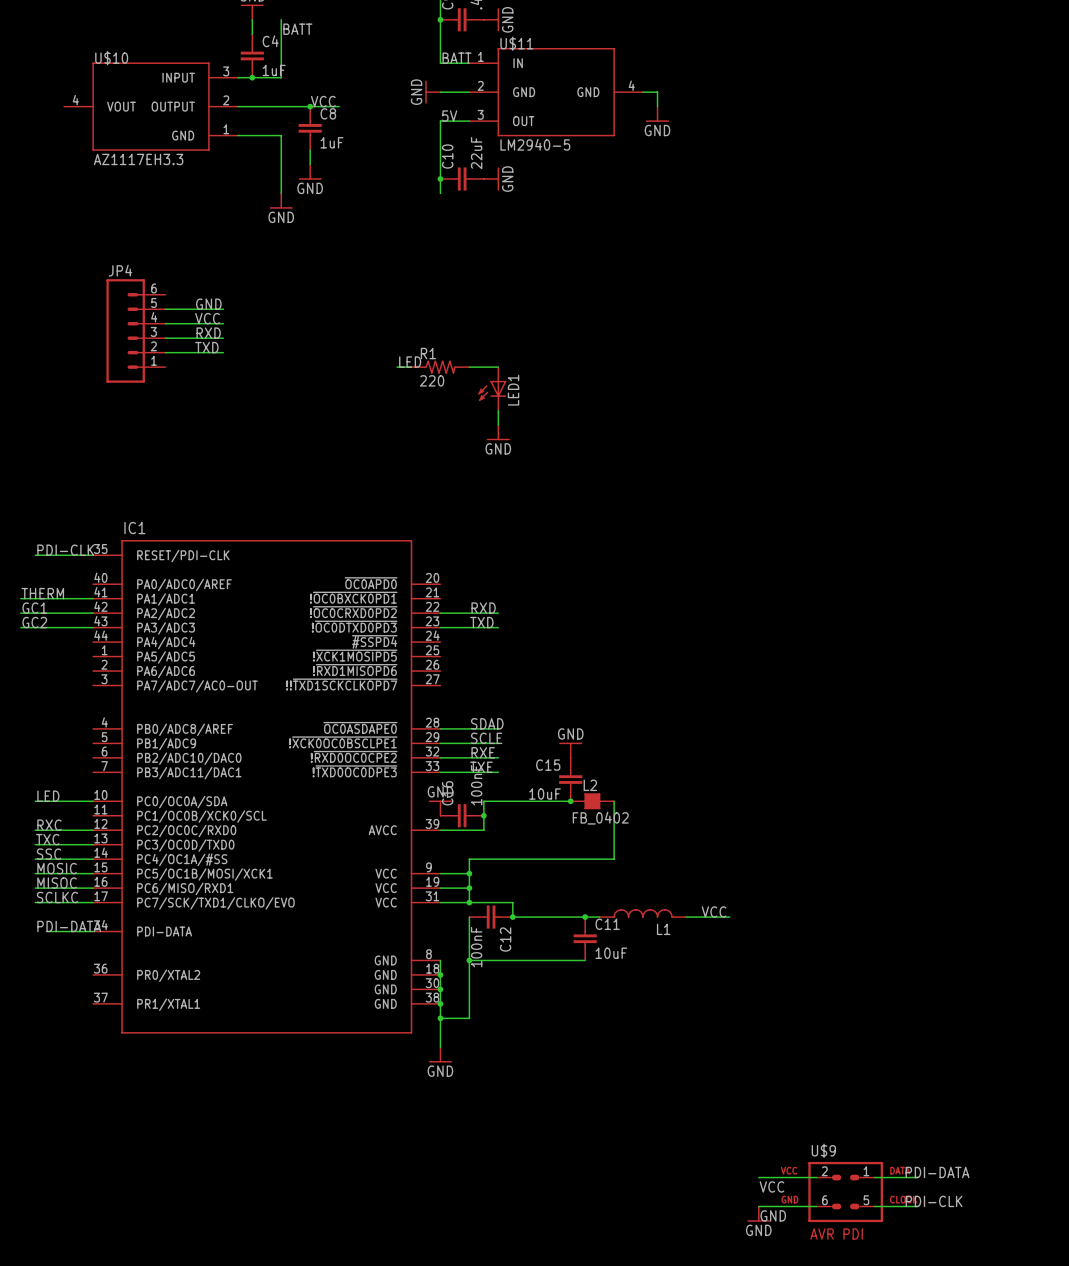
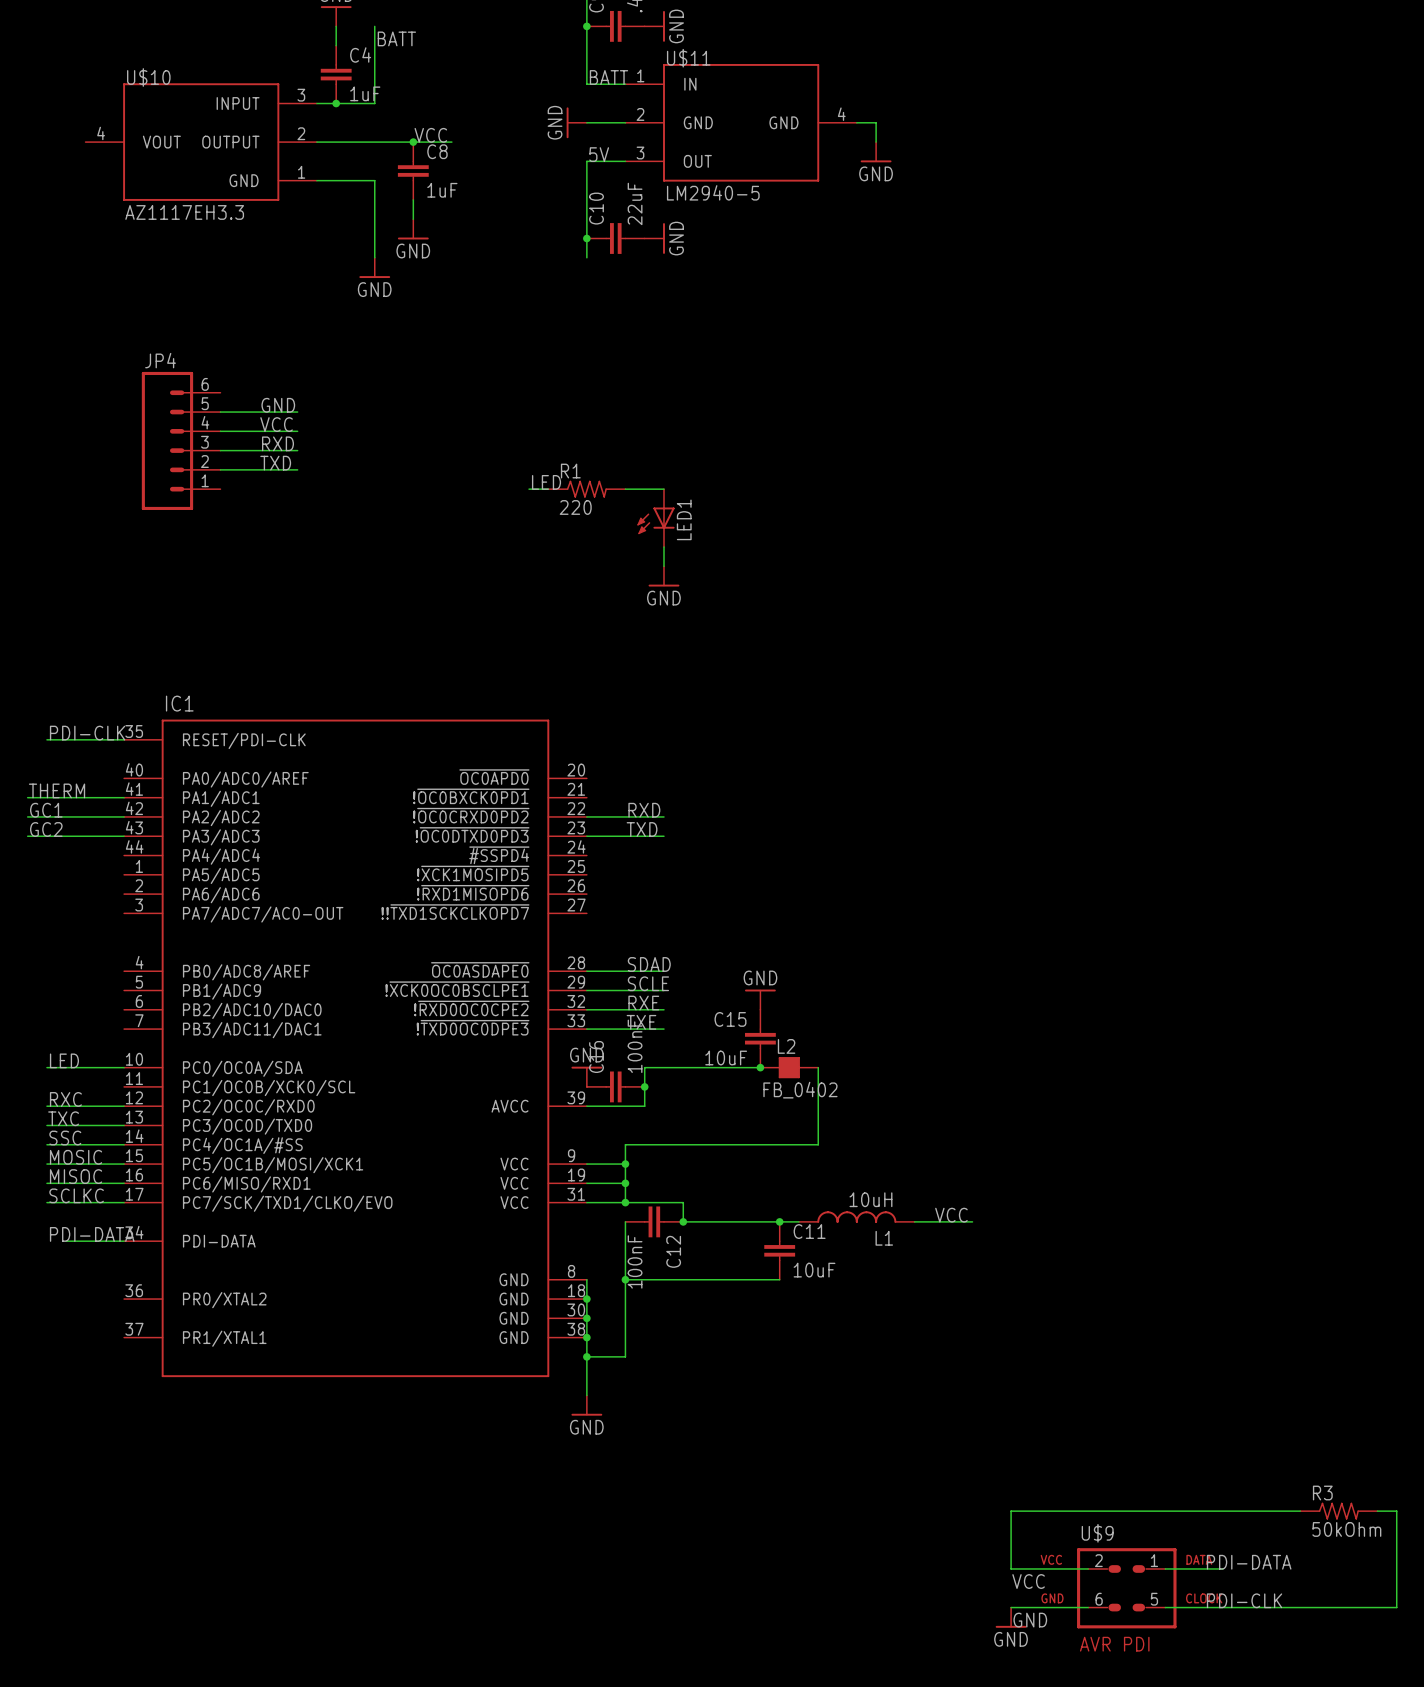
L1 value: none -> 10uH (870, 1199)
wire: none -> (1300, 1511) (1011, 1511) (1011, 1568)
R3: none -> 50kOhm (1338, 1511)
wire: none -> (1377, 1511) (1396, 1511) (1396, 1607) (1223, 1607)

